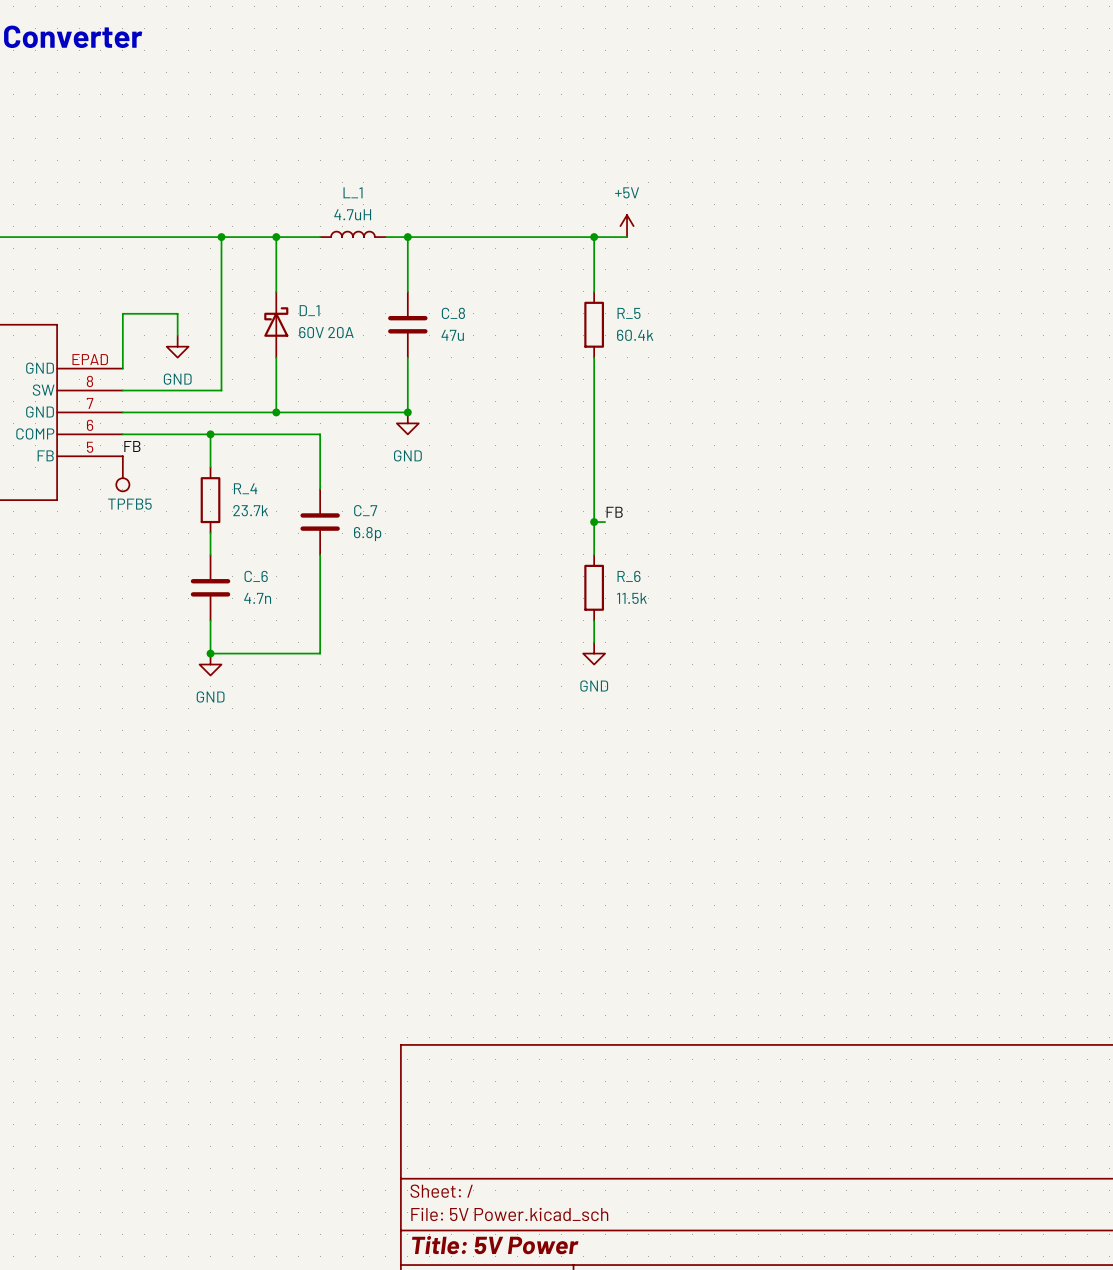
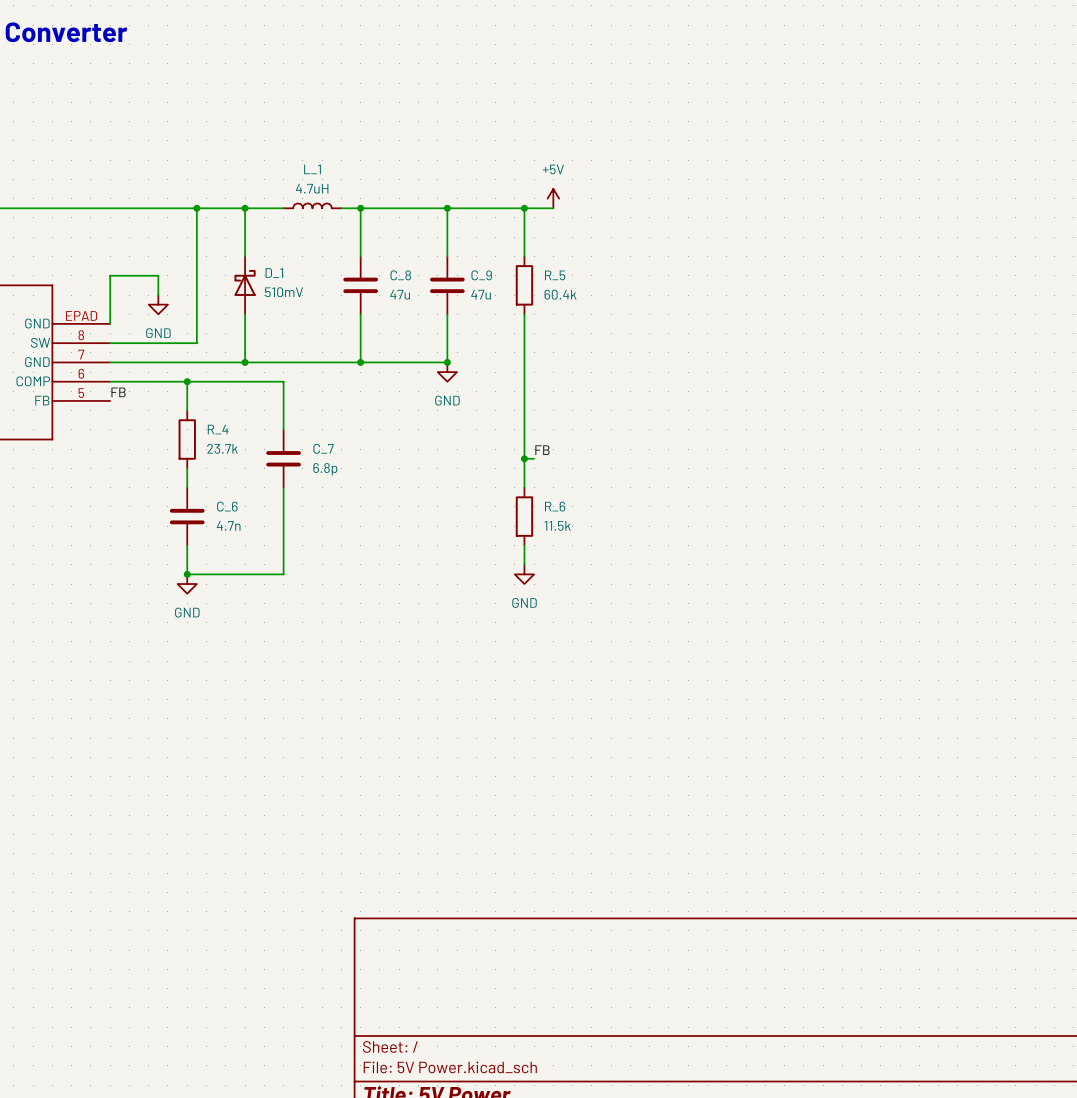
wire: none -> (447, 208) (447, 256)
junction: none -> (447, 208)
C_9: none -> 47u (447, 285)
D_1 value: 60V 20A (326, 332) -> 510mV (284, 292)
wire: none -> (447, 314) (447, 362) (360, 362)
junction: none -> (447, 362)
power symbol position: GND (407, 423) -> GND (447, 372)
TPFB5: (122, 473) -> none

